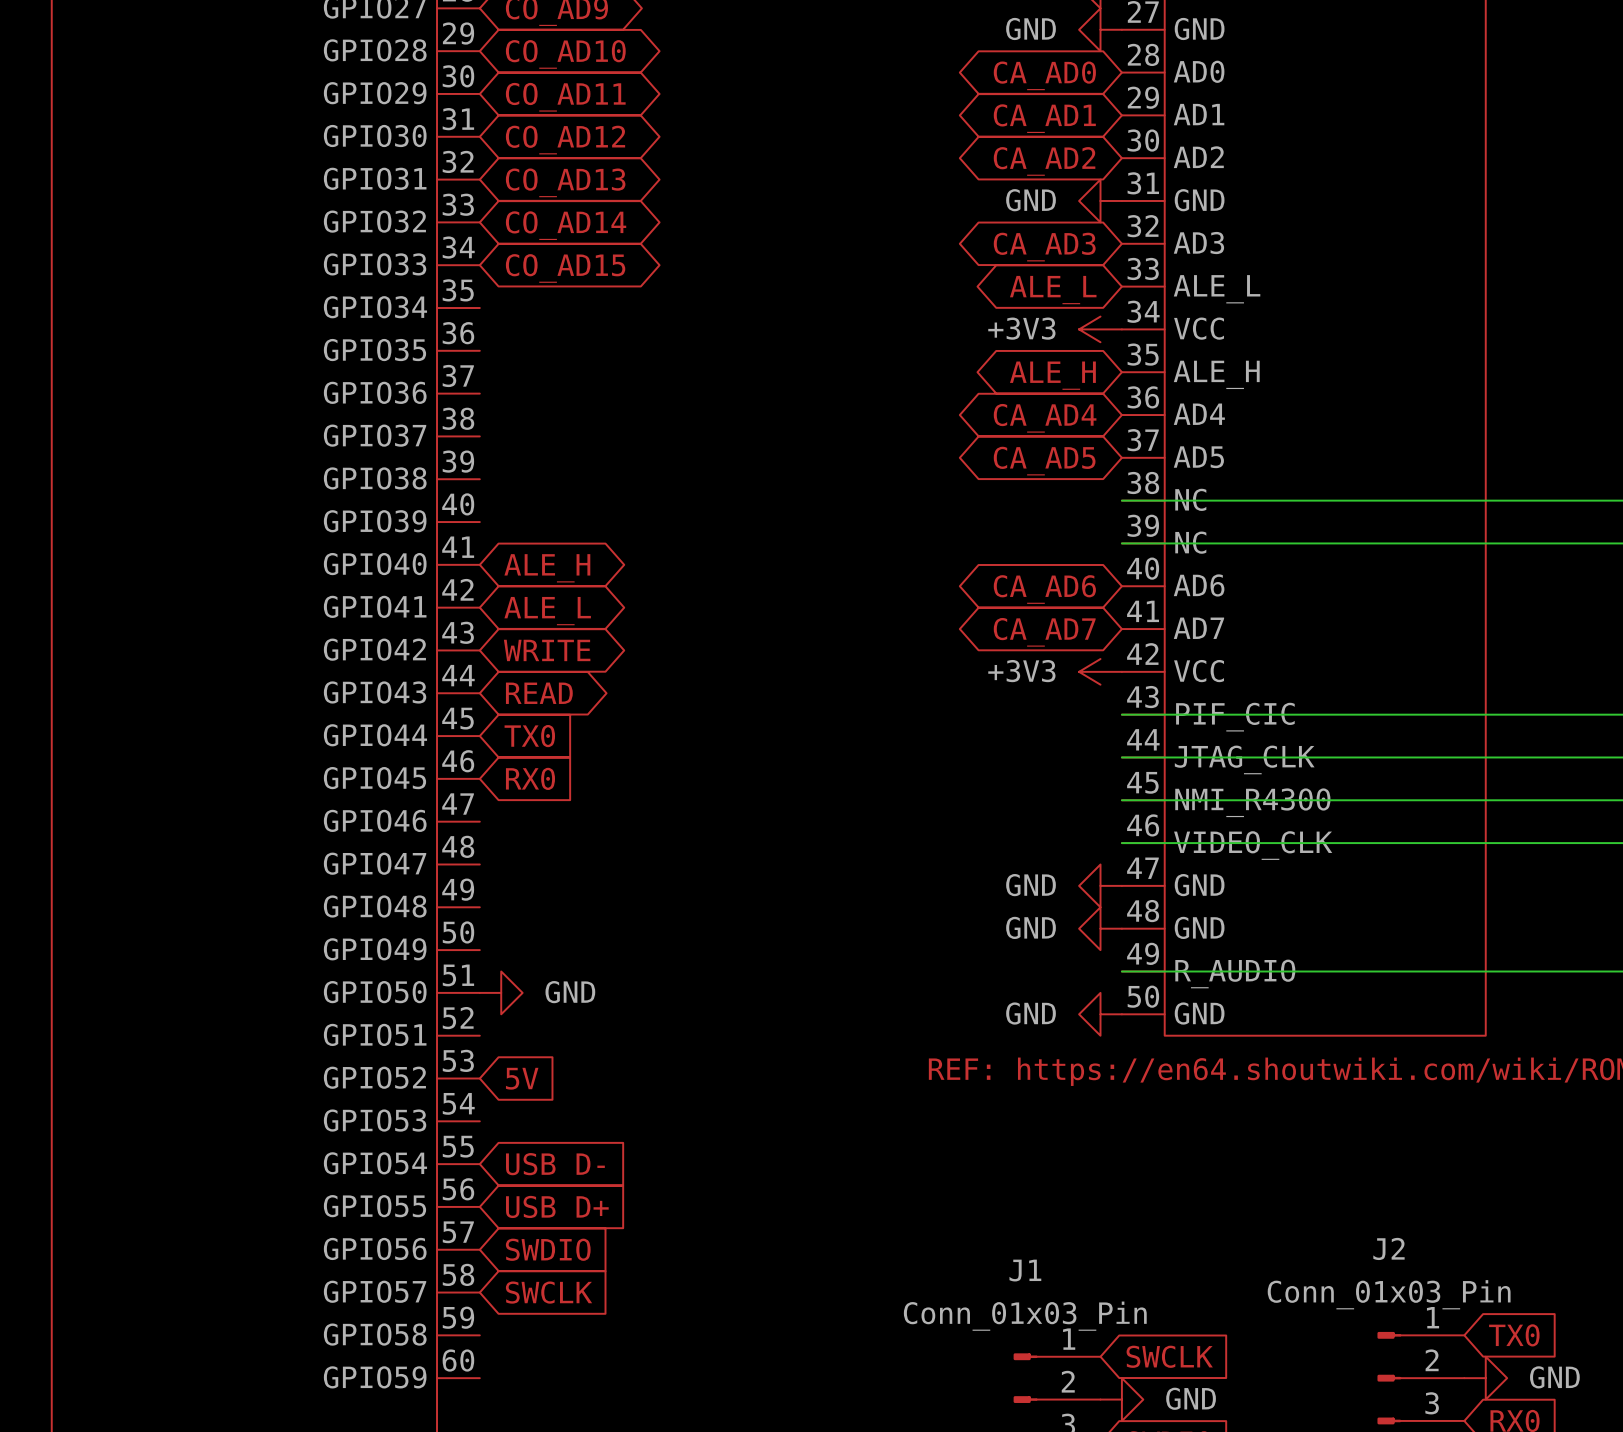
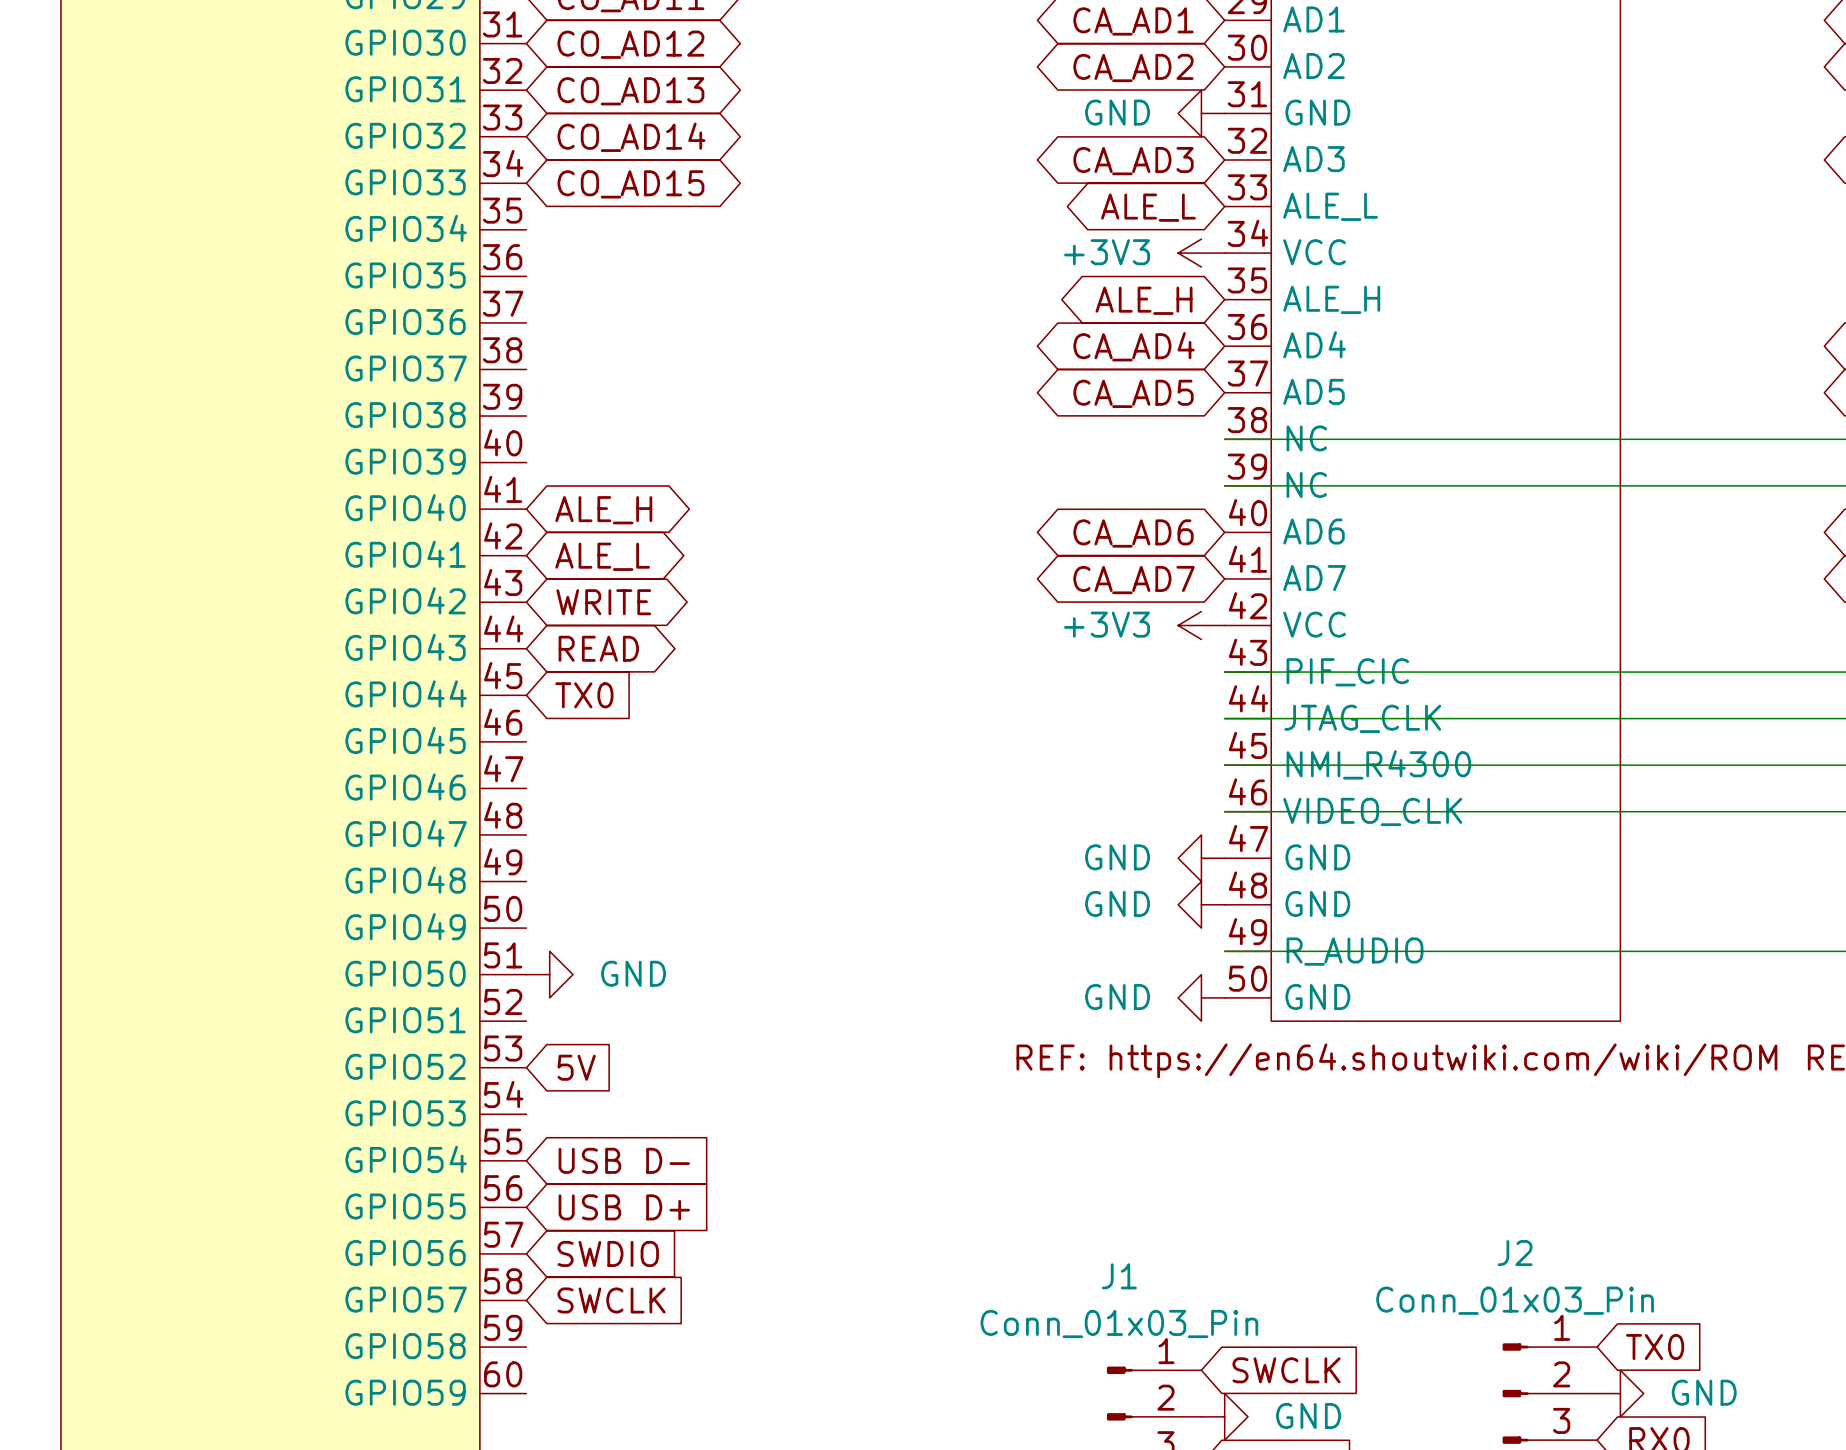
global label: RX0 (530, 778) -> none

